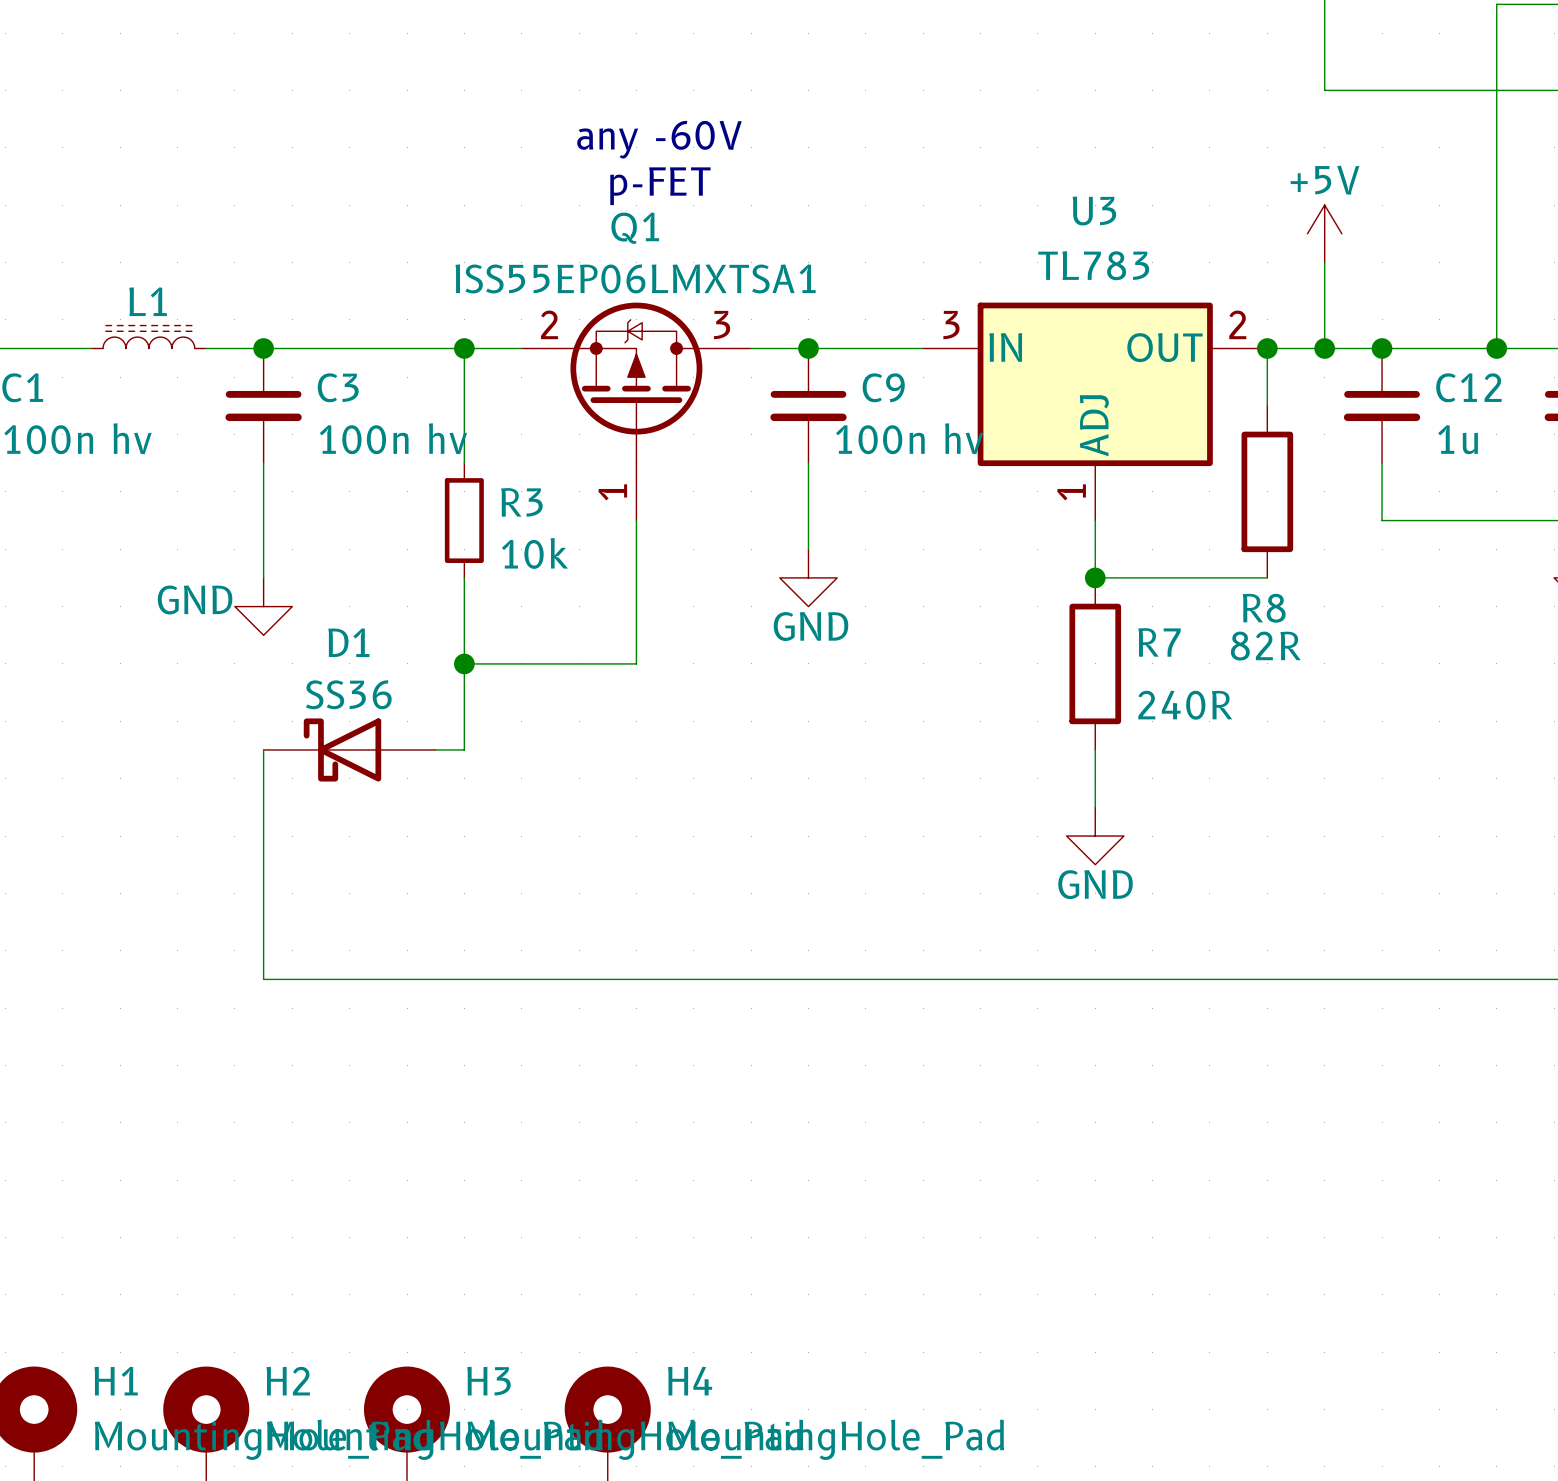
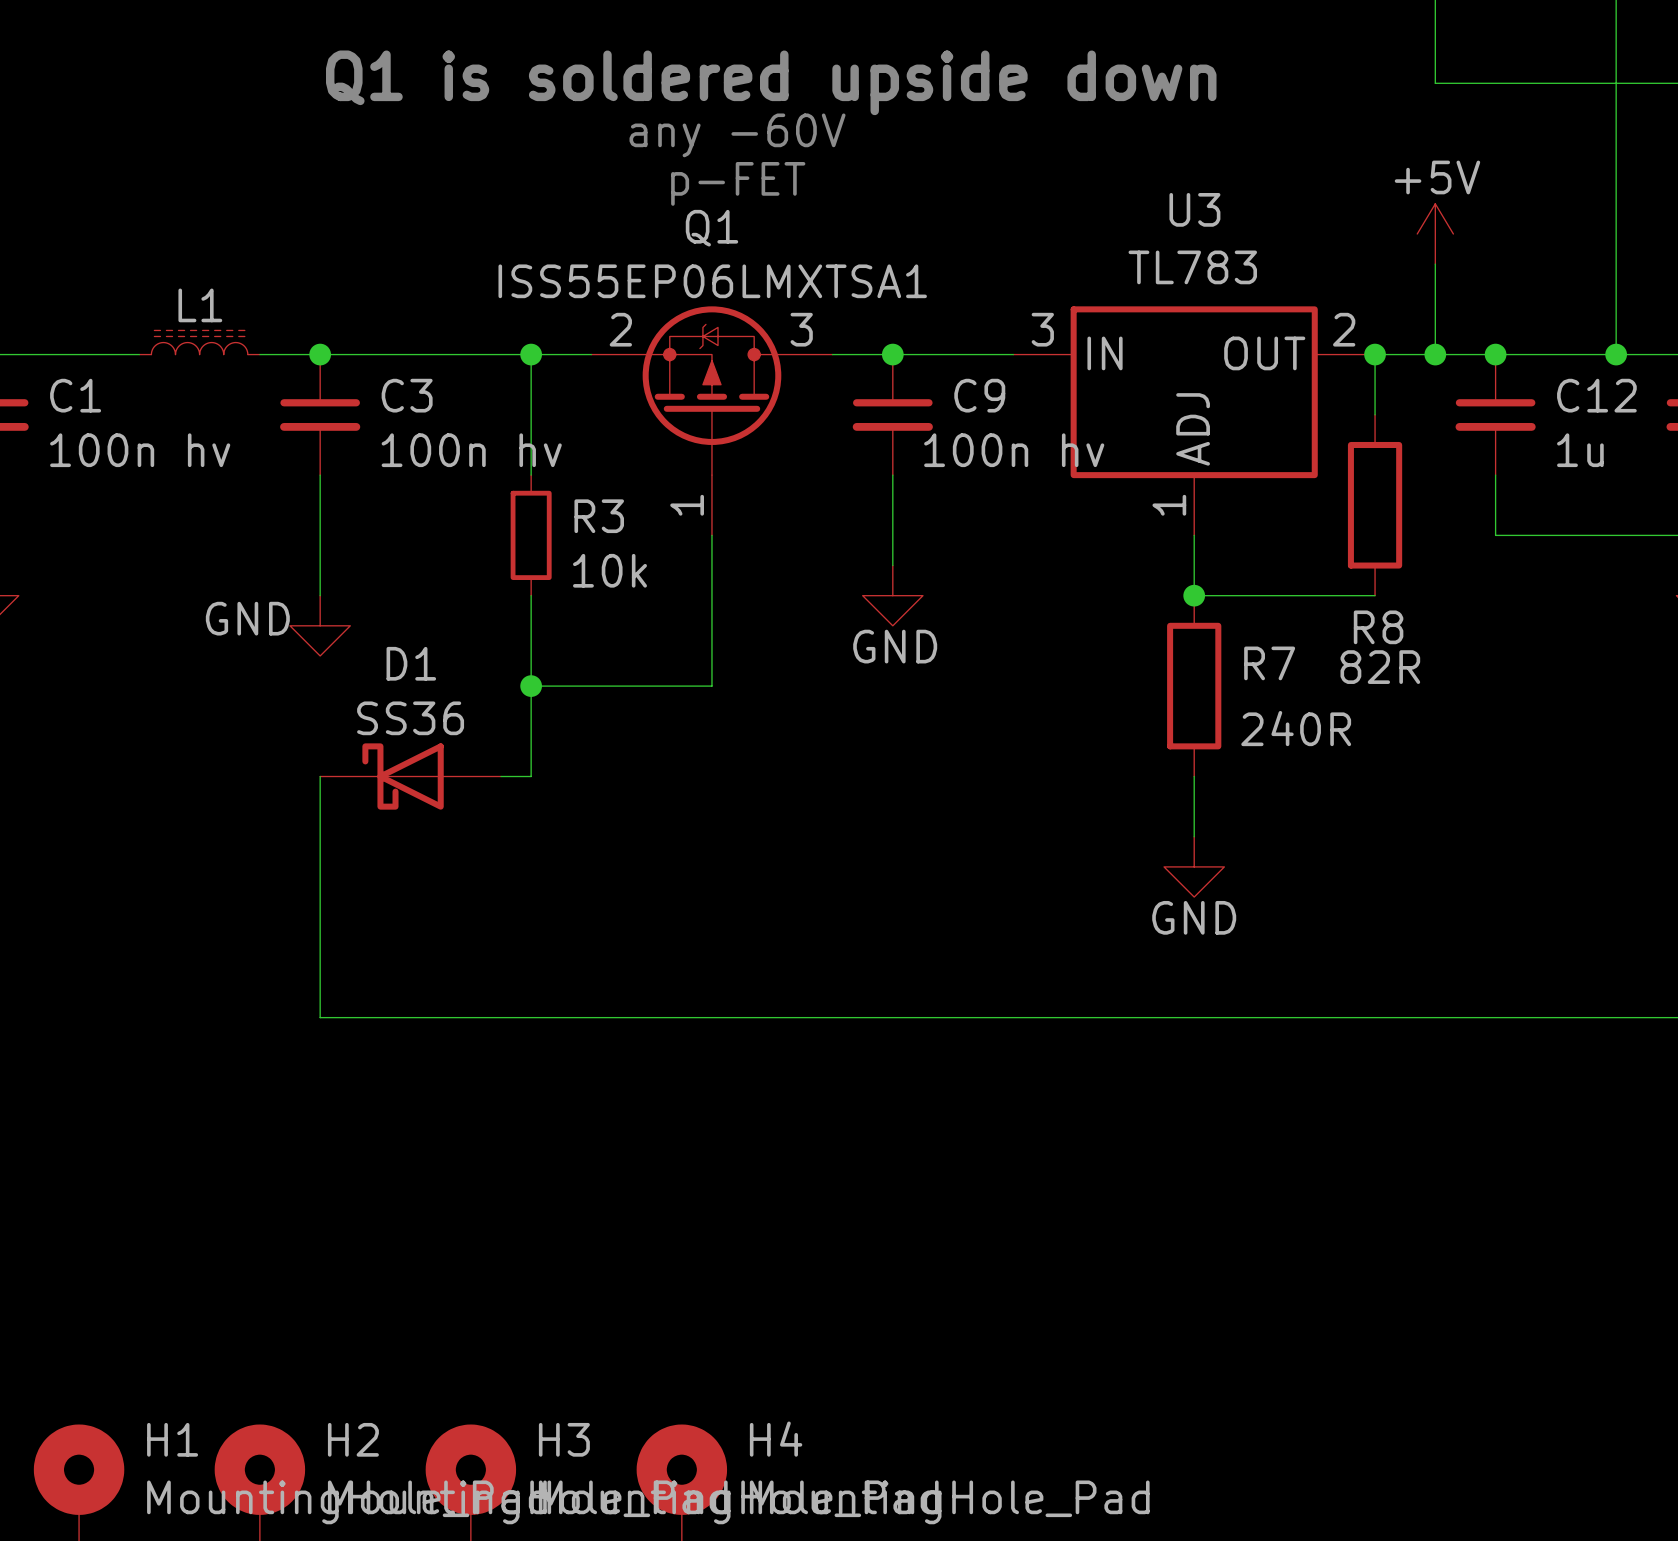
text: none -> Q1 is soldered upside down (771, 82)

